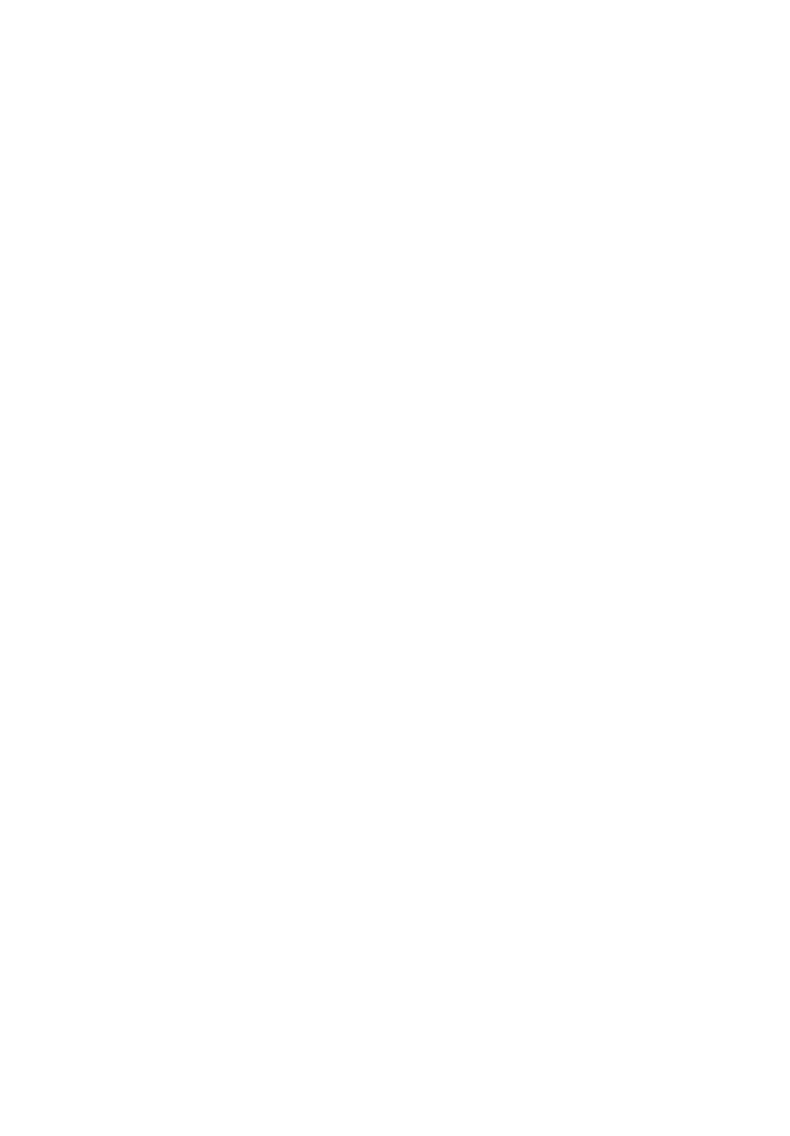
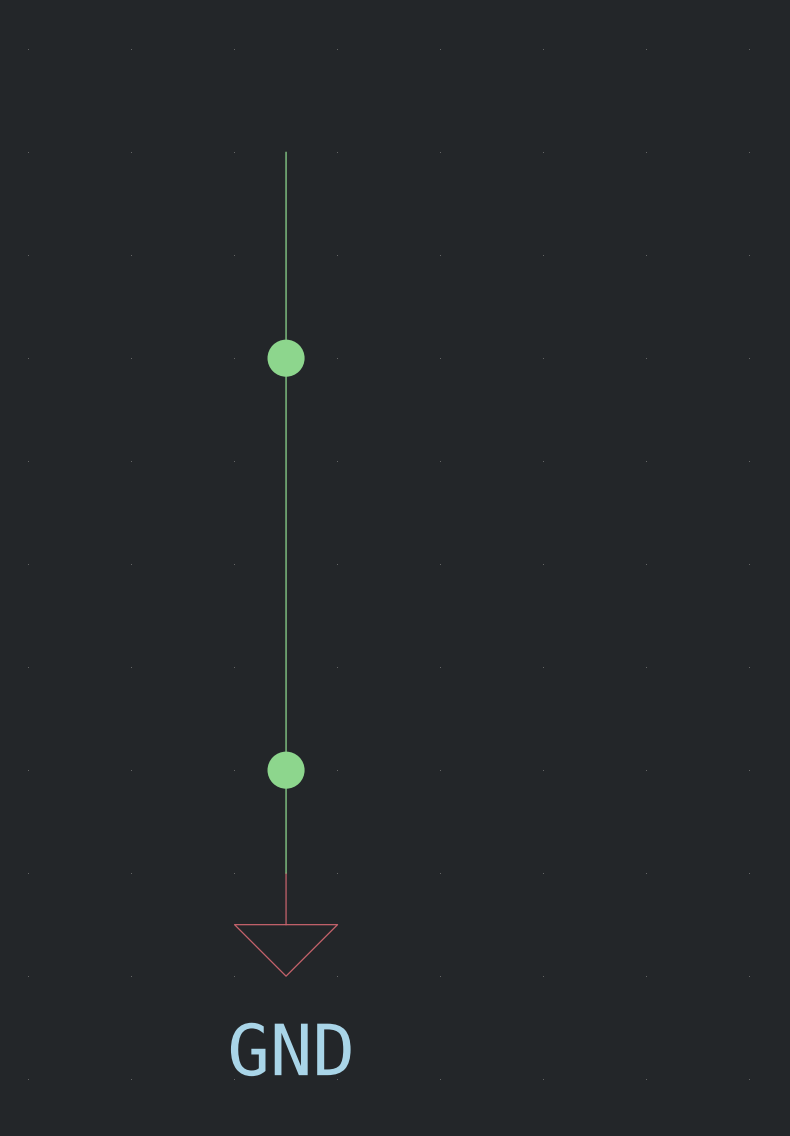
wire: none -> (286, 152) (286, 873)
junction: none -> (286, 358)
junction: none -> (286, 770)
power symbol: none -> GND (286, 924)

